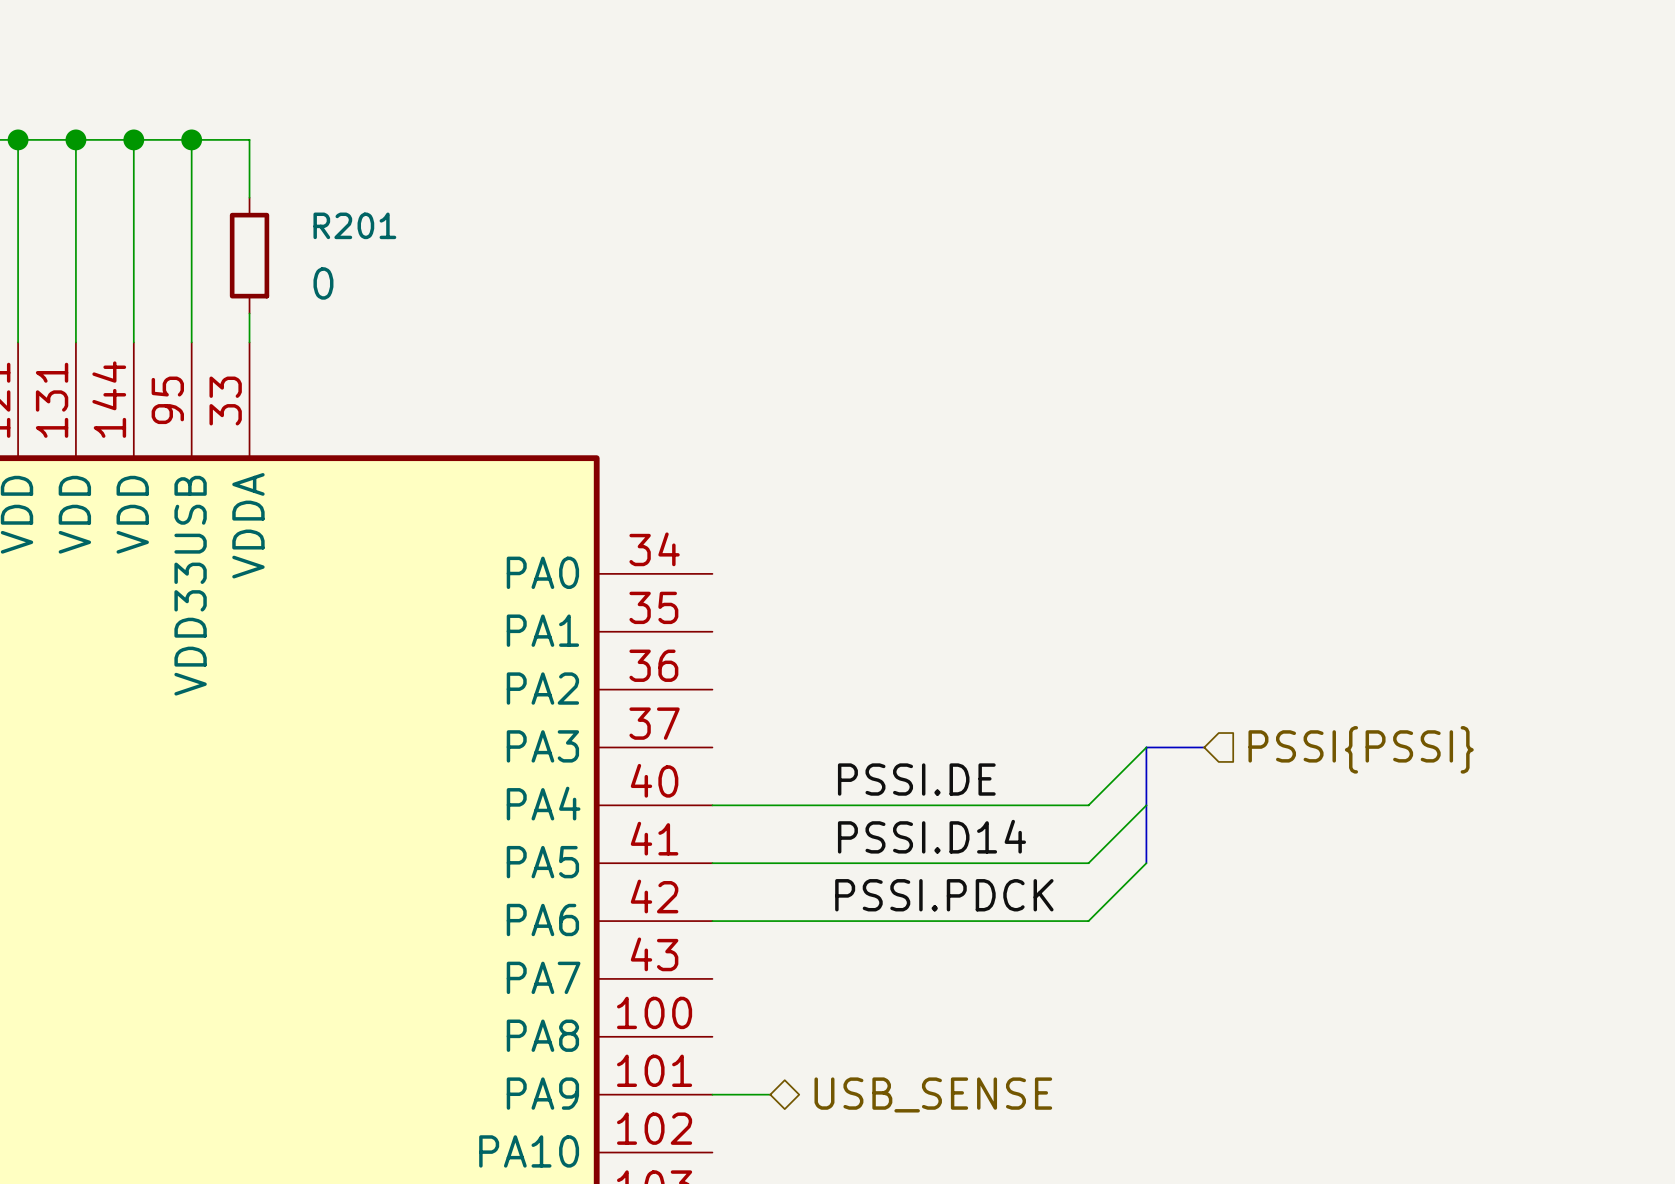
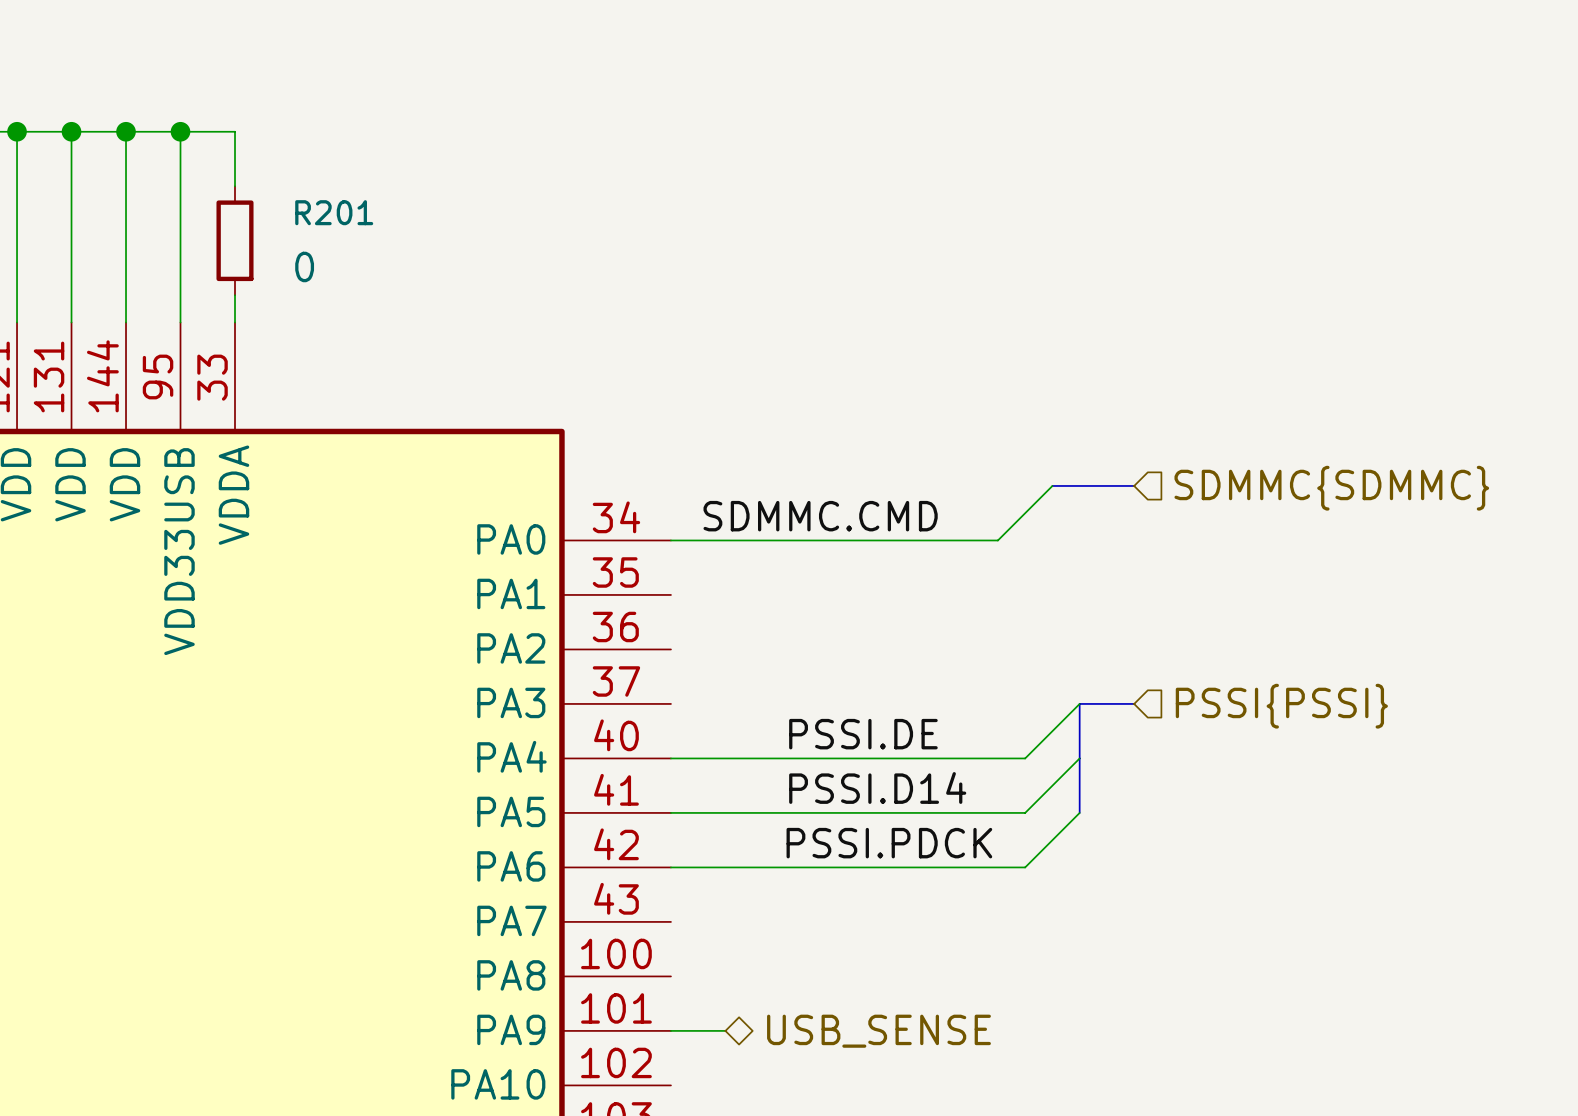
wire: none -> (1052, 485) (997, 540) (670, 540)
bus: none -> (1052, 485) (1134, 485)
hierarchical label: none -> SDMMC{SDMMC} (1331, 488)
label: none -> SDMMC.CMD (820, 516)

